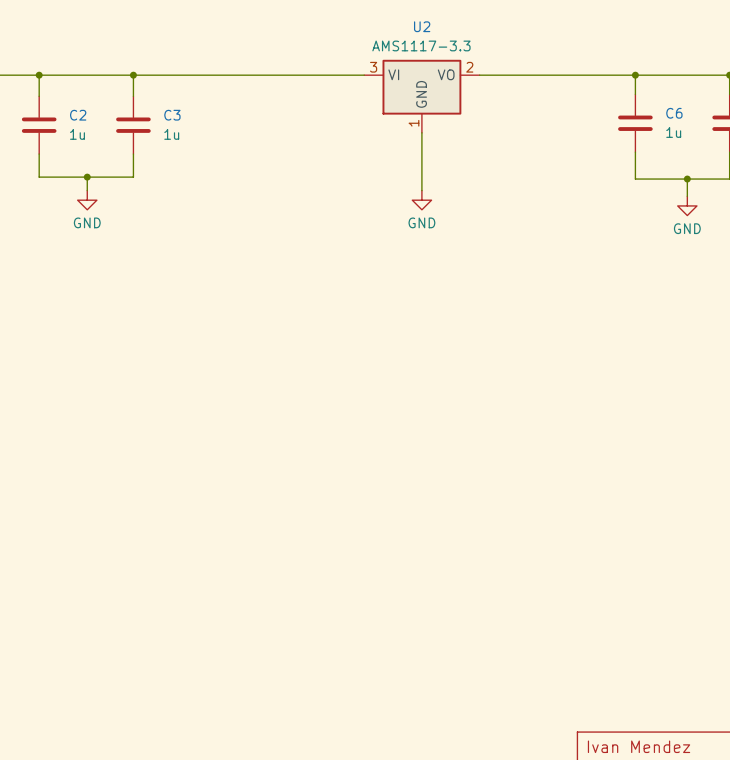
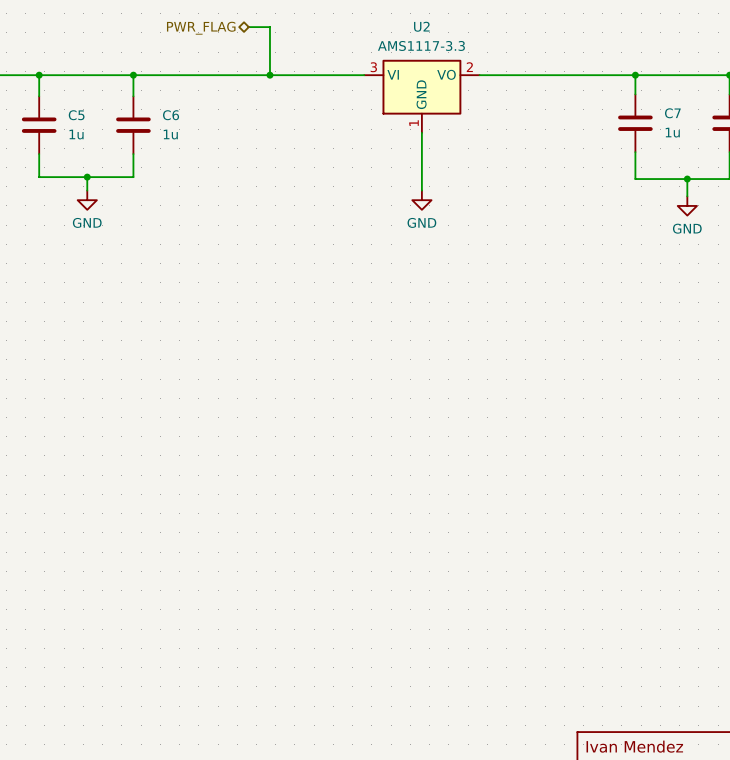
hierarchical label: none -> PWR_FLAG (201, 28)
wire: none -> (248, 27) (269, 27) (269, 75)
junction: none -> (269, 75)
C6 name: C6 (674, 113) -> C7 (672, 113)
C2 name: C2 (78, 115) -> C5 (76, 115)
C3 name: C3 (172, 115) -> C6 (171, 115)

